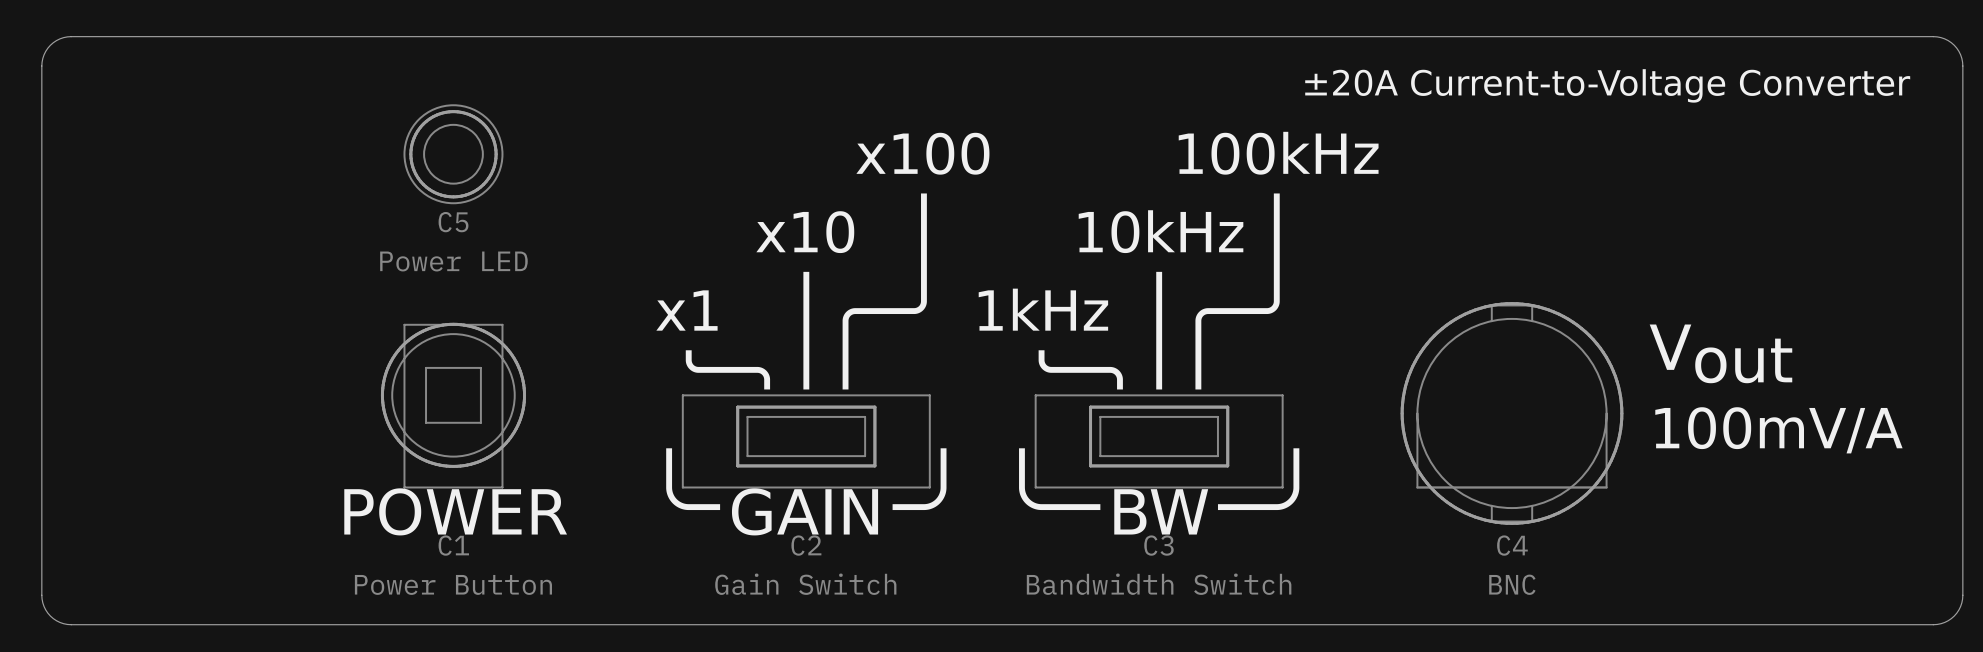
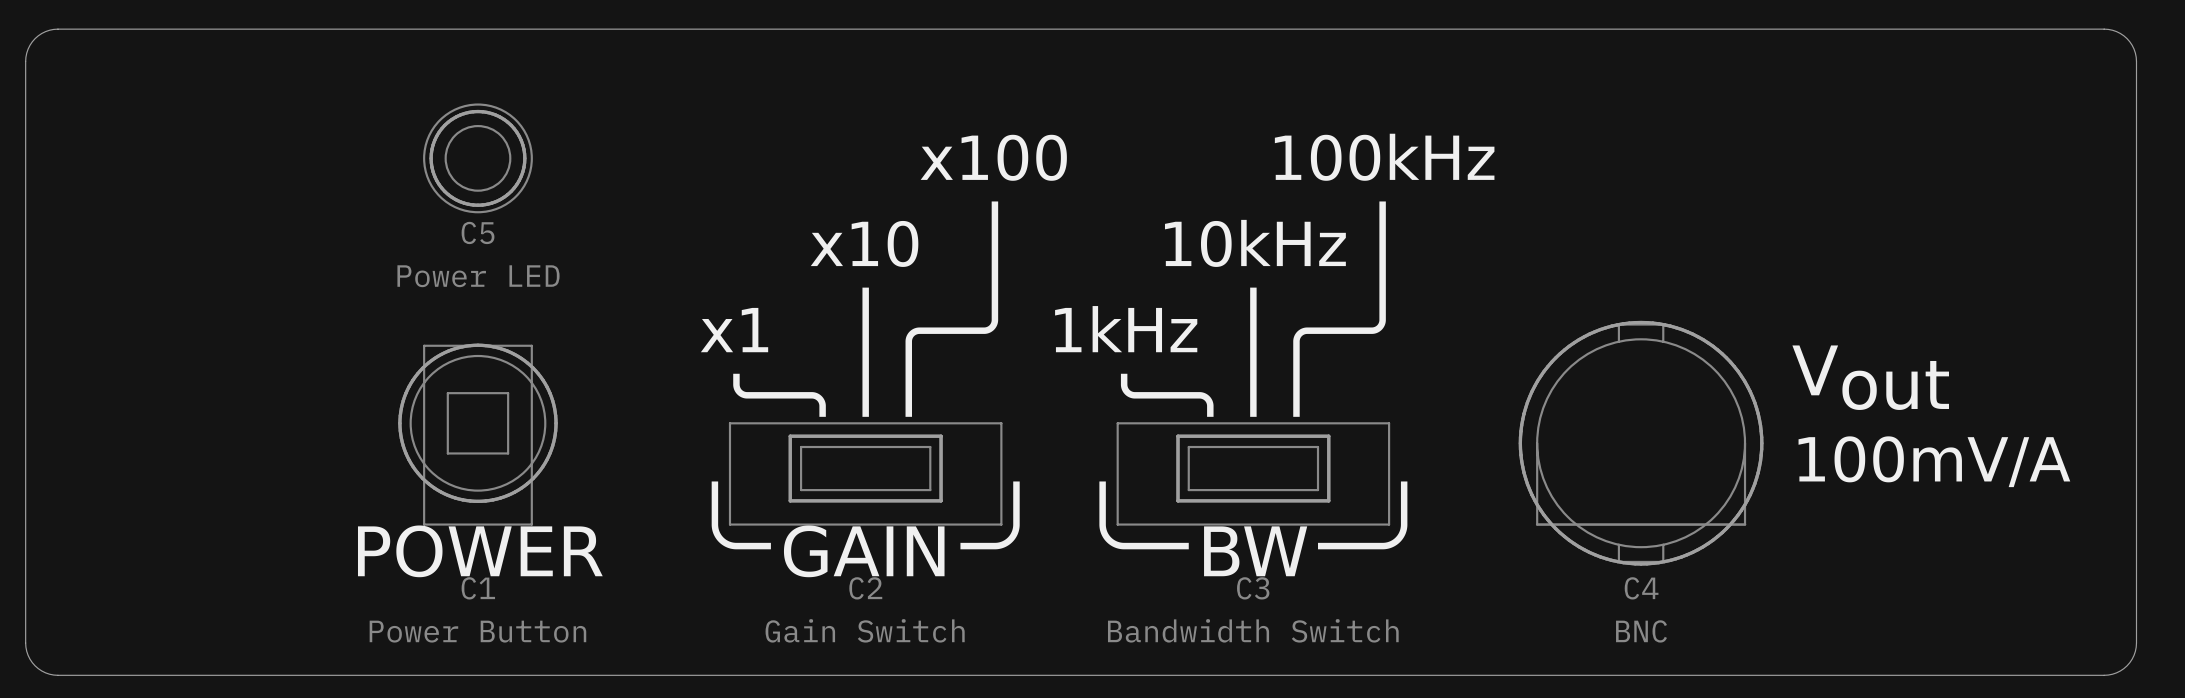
drawing: [344, 69, 1911, 536] -> none

